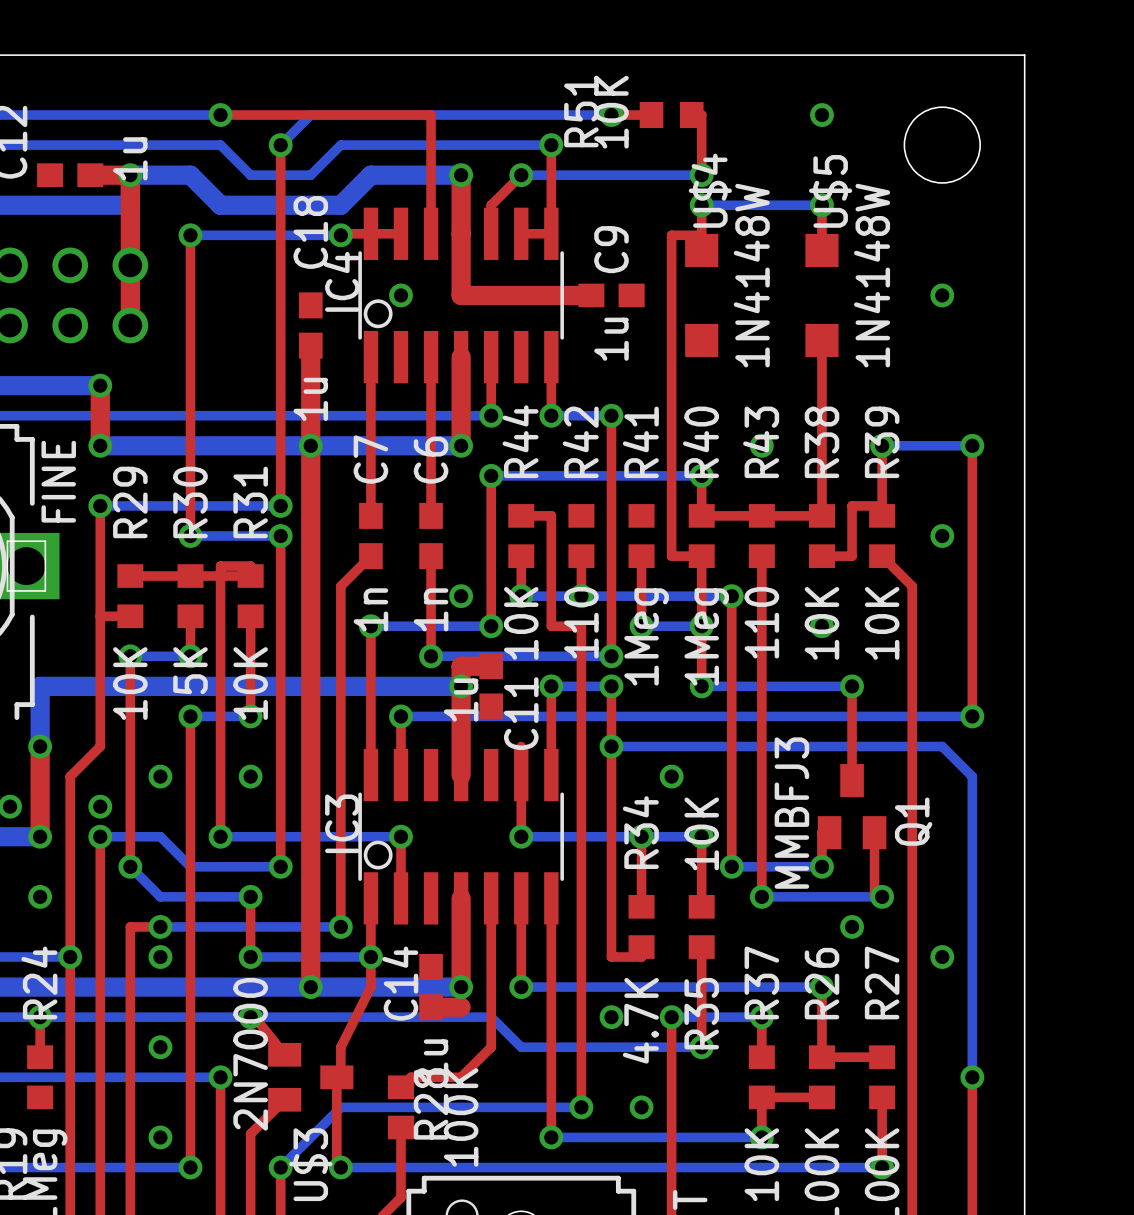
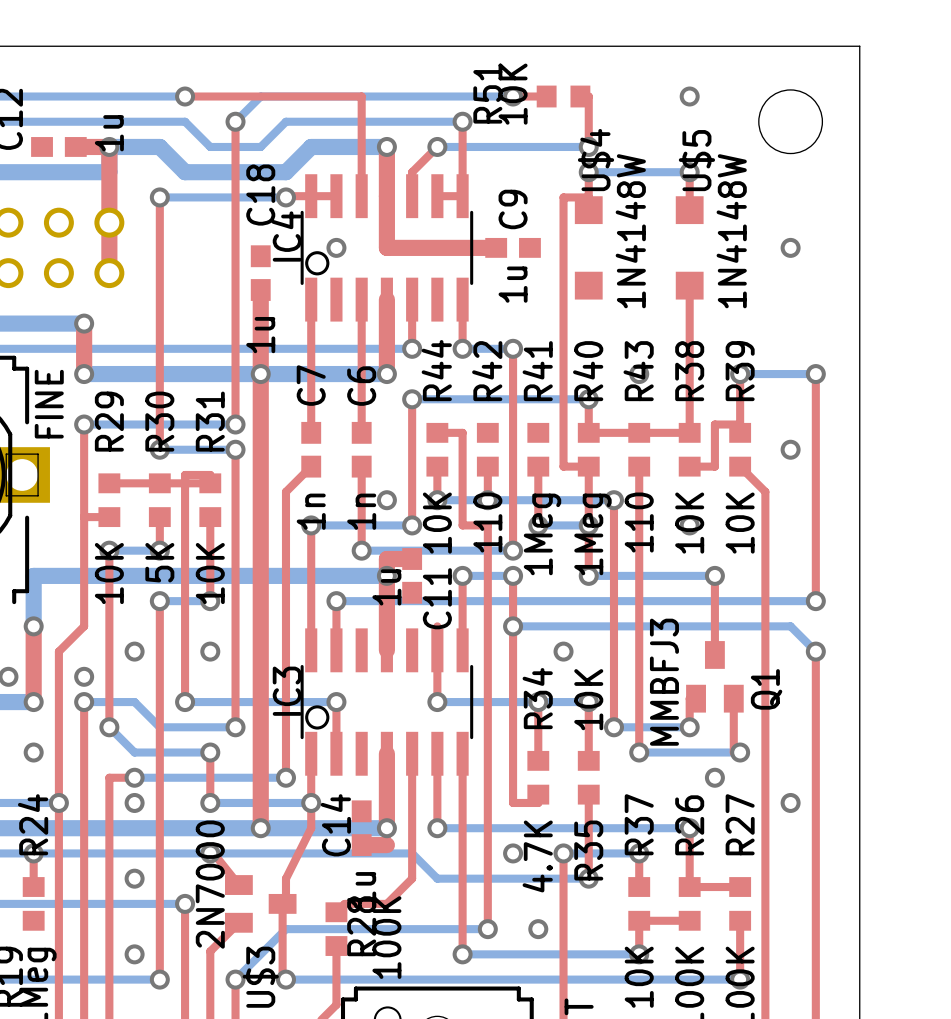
top track: none -> (815, 651) (815, 903)
bottom track: (972, 776) (972, 1077) -> none
via: none -> (815, 651)
via: (972, 1077) -> none

